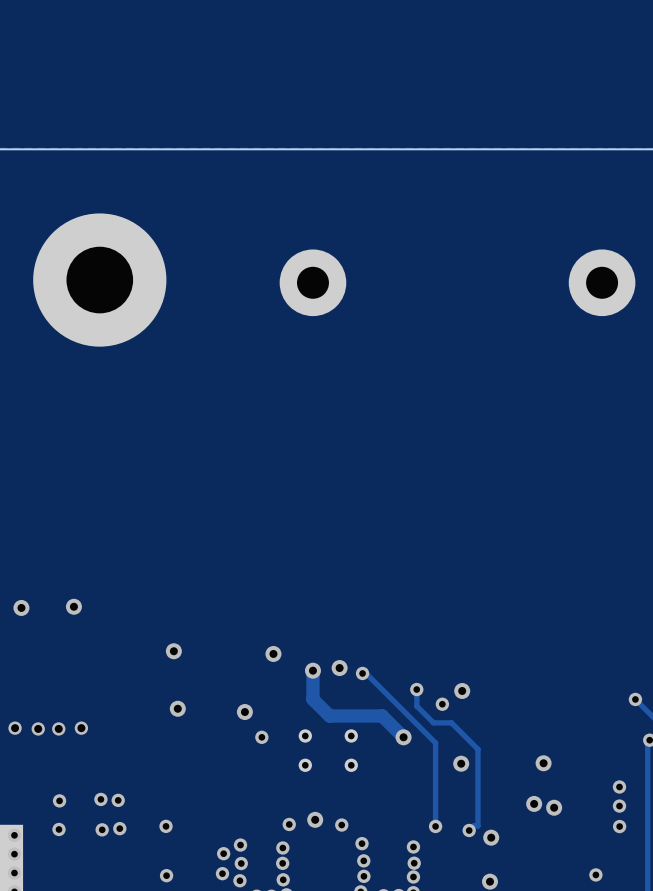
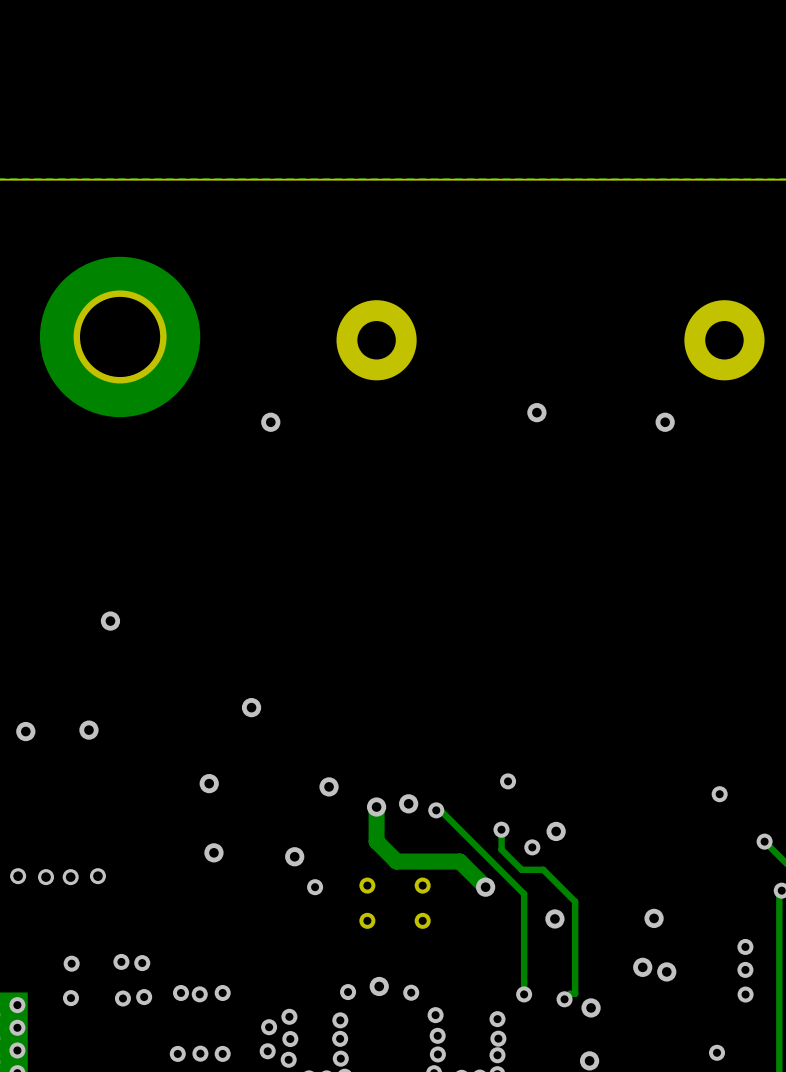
via: none -> (536, 412)
via: none -> (270, 422)
via: none -> (665, 422)
via: none -> (110, 621)
via: none -> (251, 707)
via: none -> (508, 781)
via: none -> (719, 794)
via: none -> (181, 992)
via: none -> (222, 992)
via: none -> (177, 1053)
via: none -> (222, 1053)

